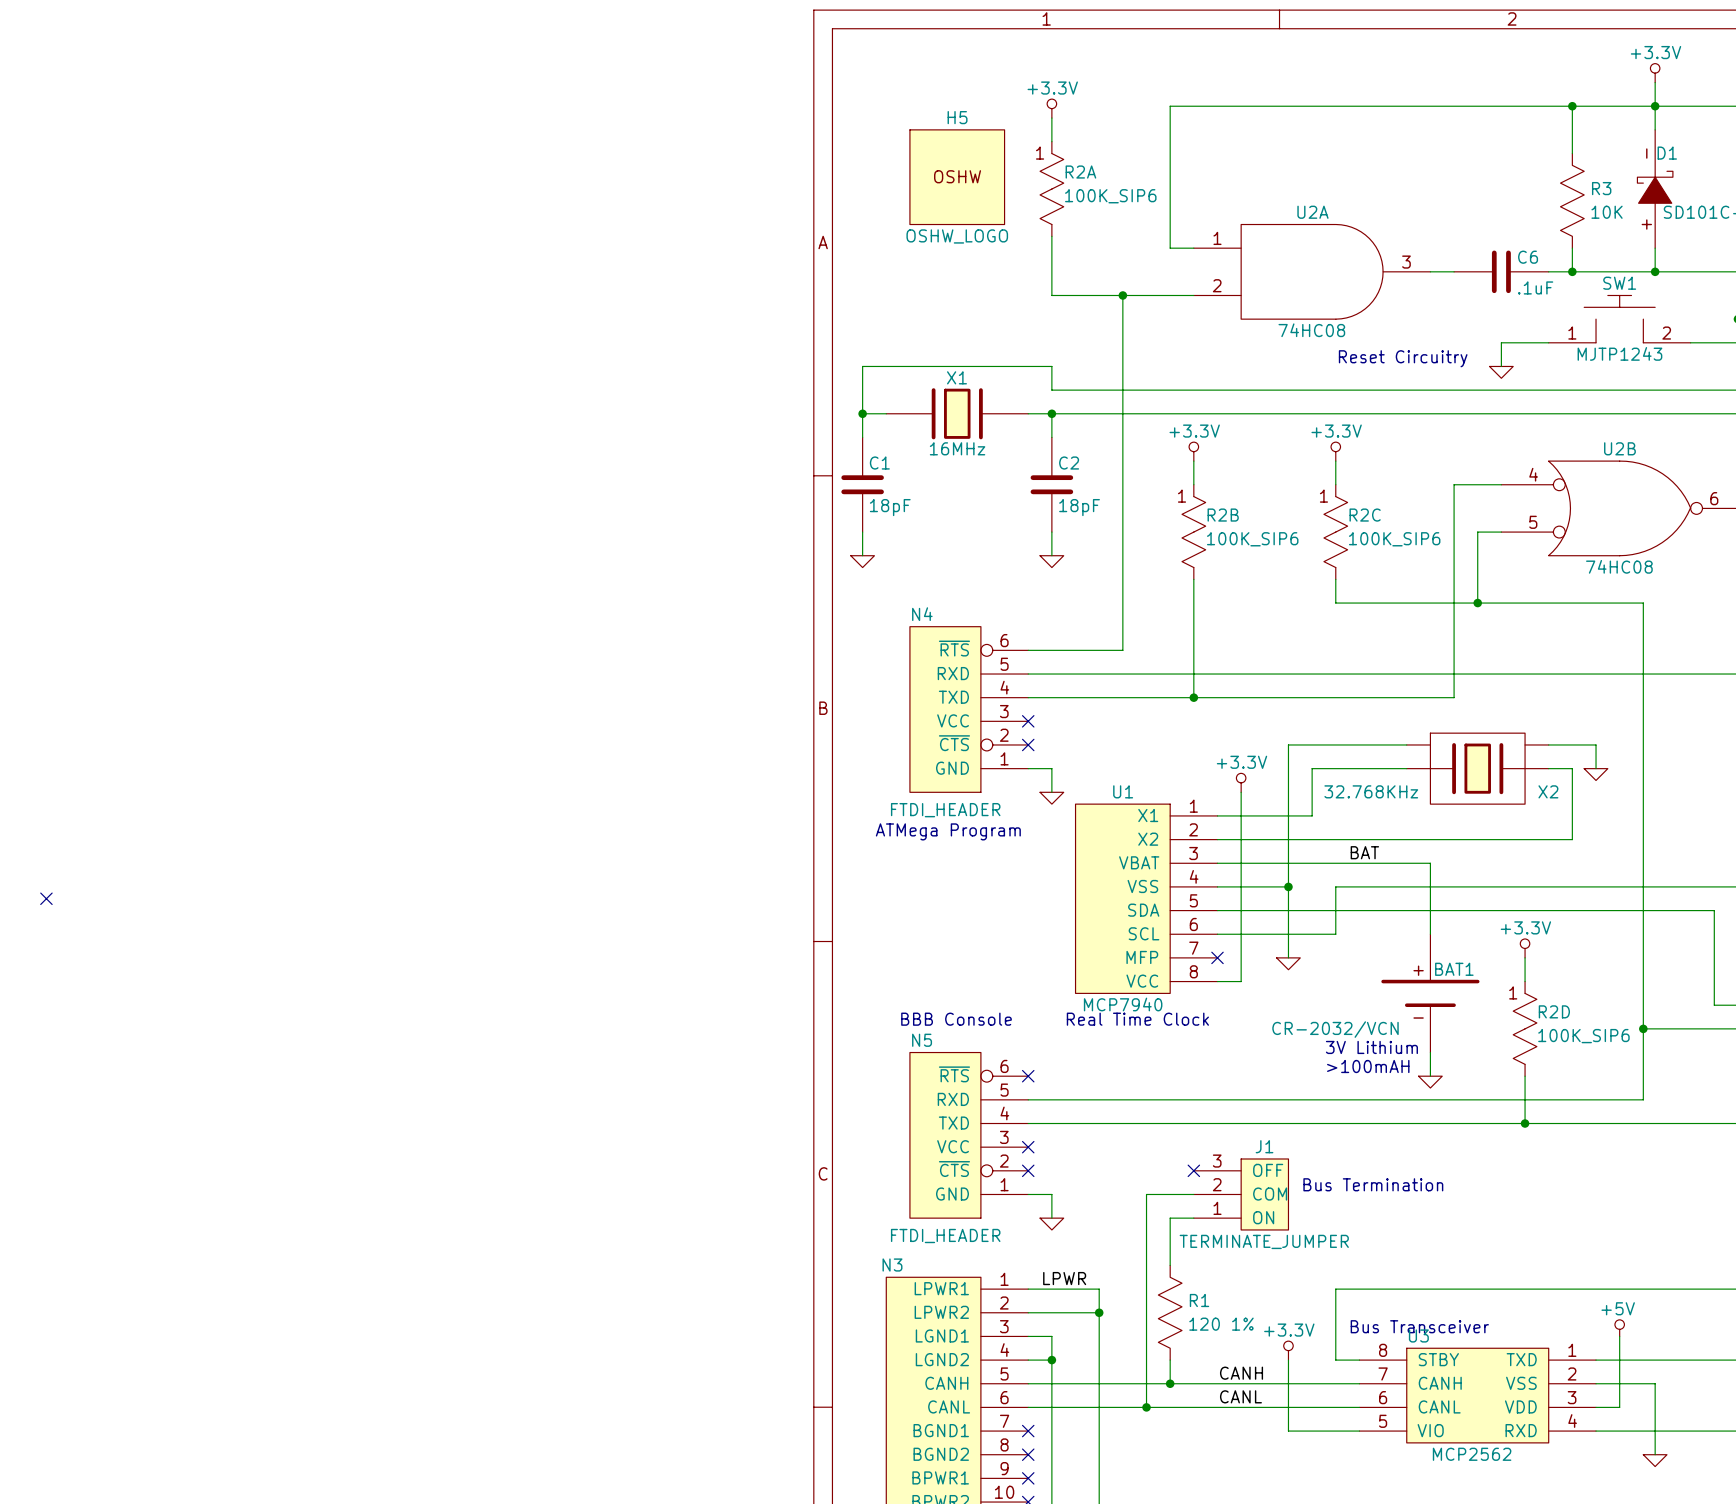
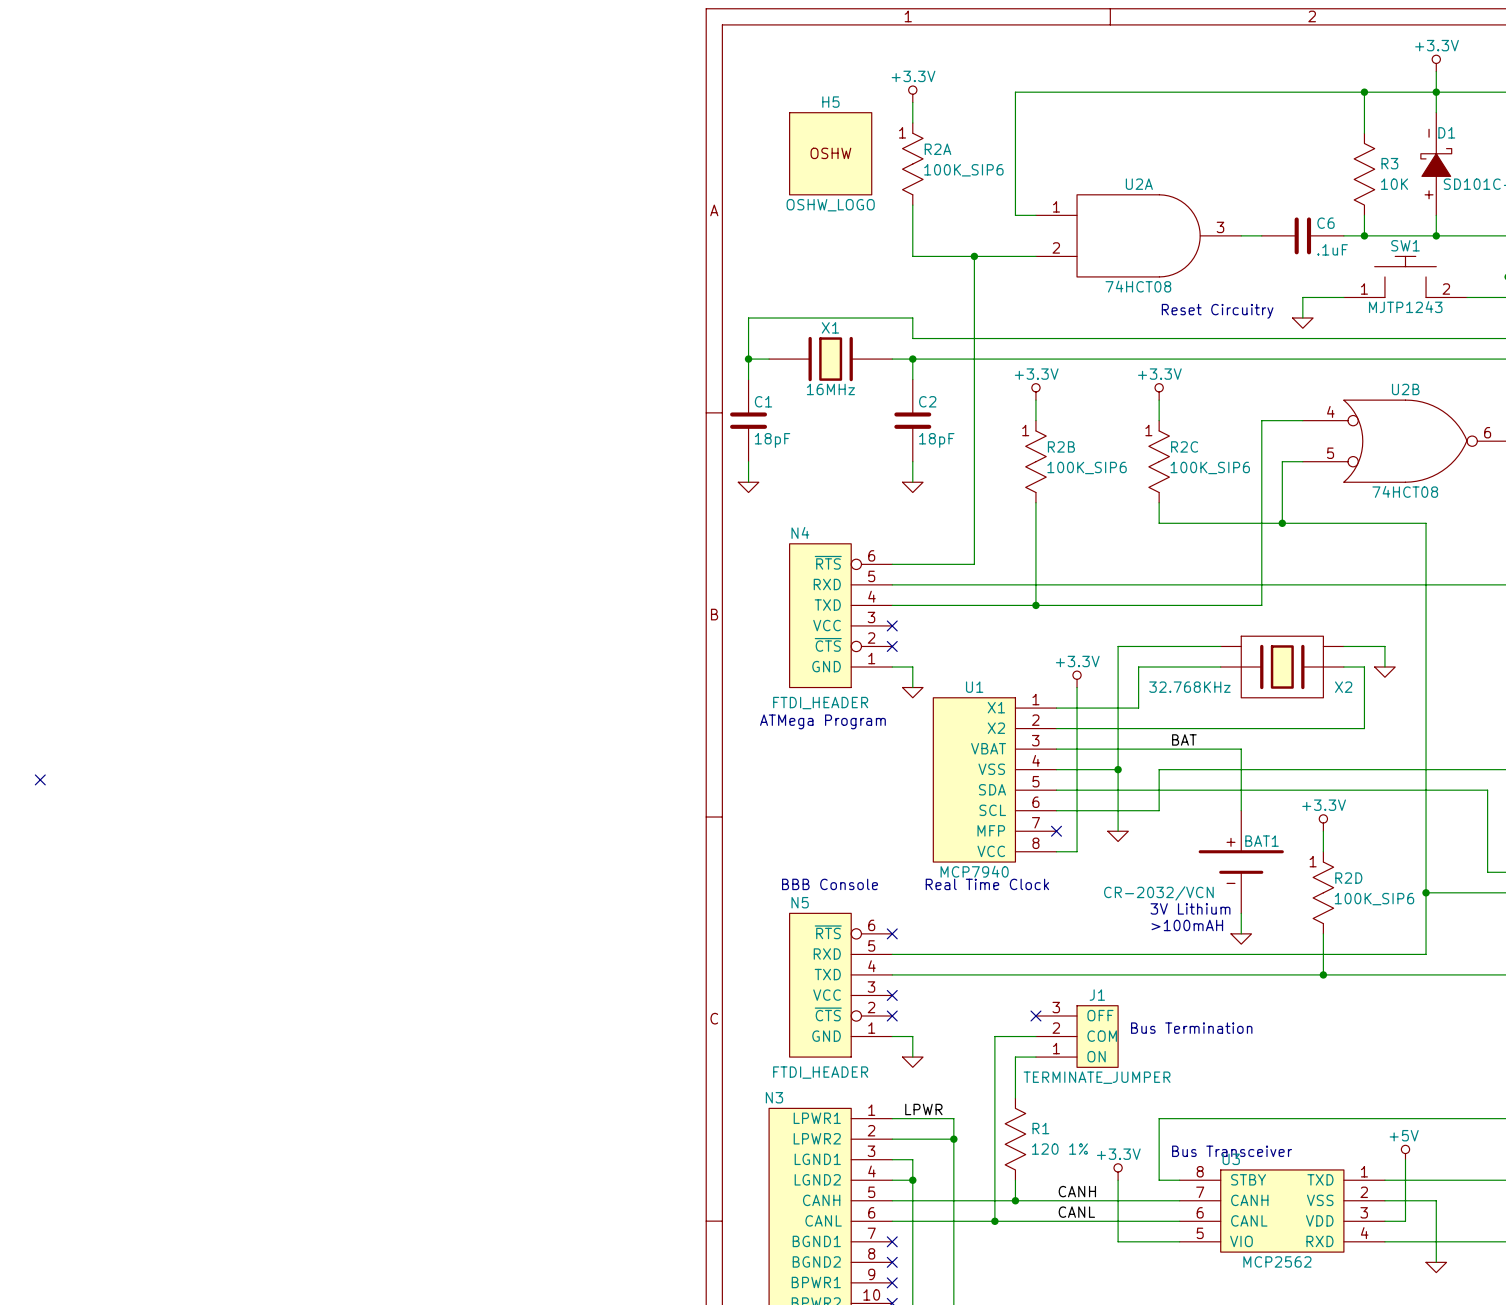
U2A value: 74HC08 (1311, 330) -> 74HCT08 (1138, 286)
U2B value: 74HC08 (1619, 566) -> 74HCT08 (1405, 491)

